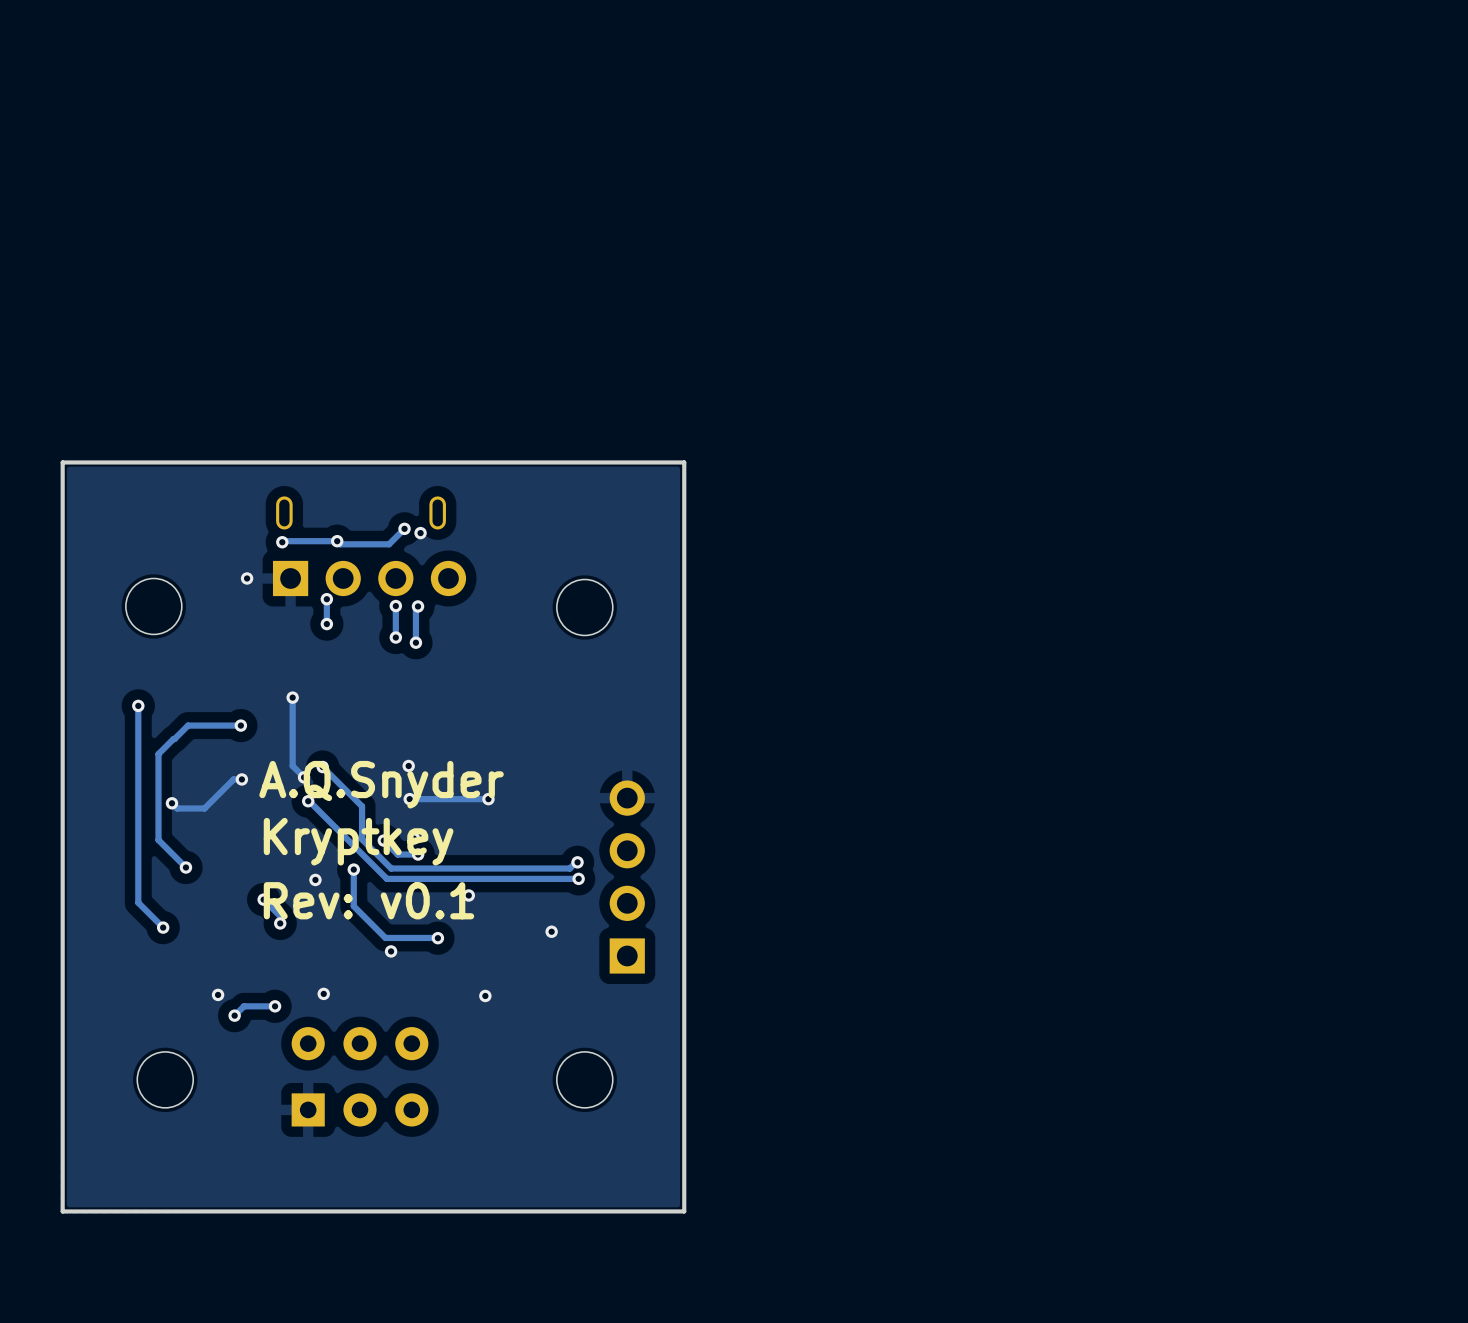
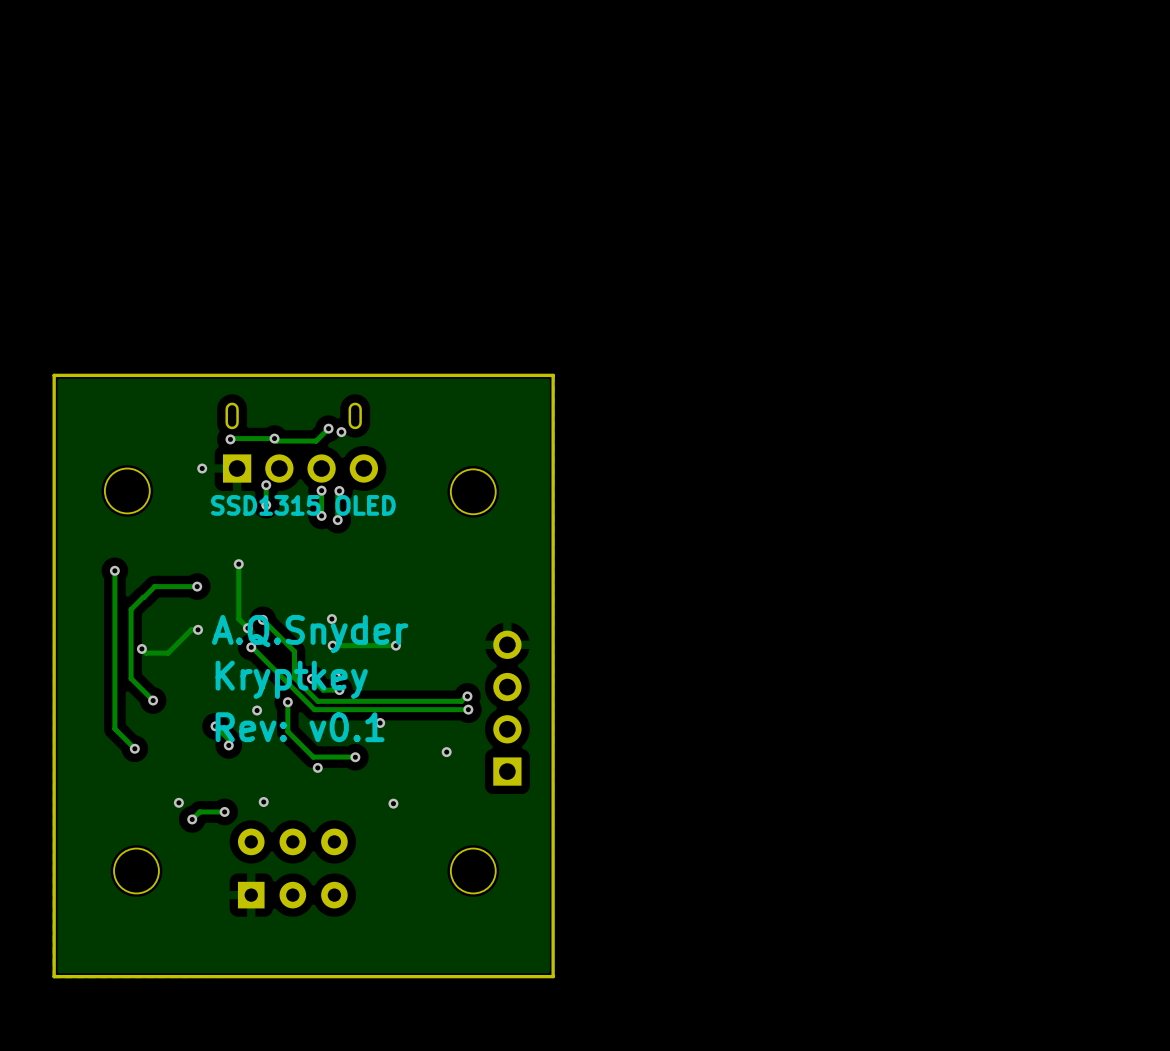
text: none -> SSD1315 OLED (303, 505)

